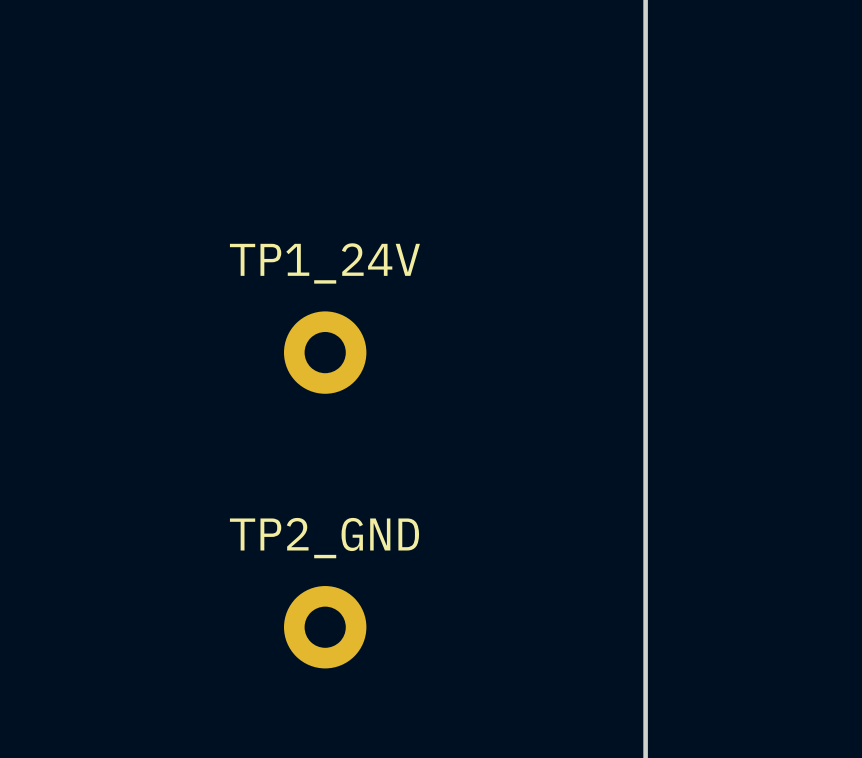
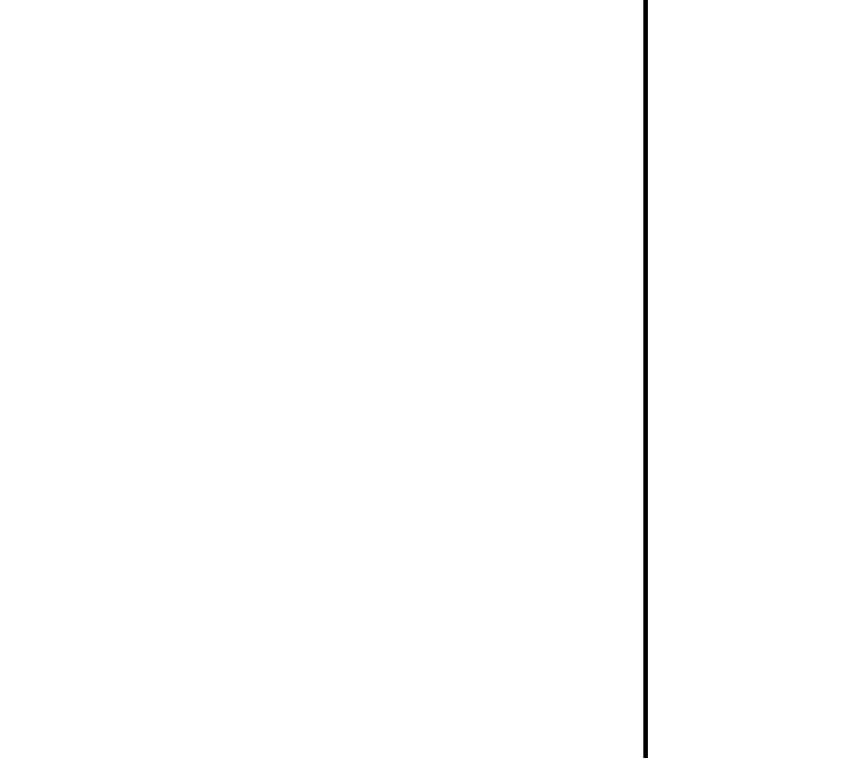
TP1_24V: (325, 352) -> none
TP2_GND: (325, 627) -> none

